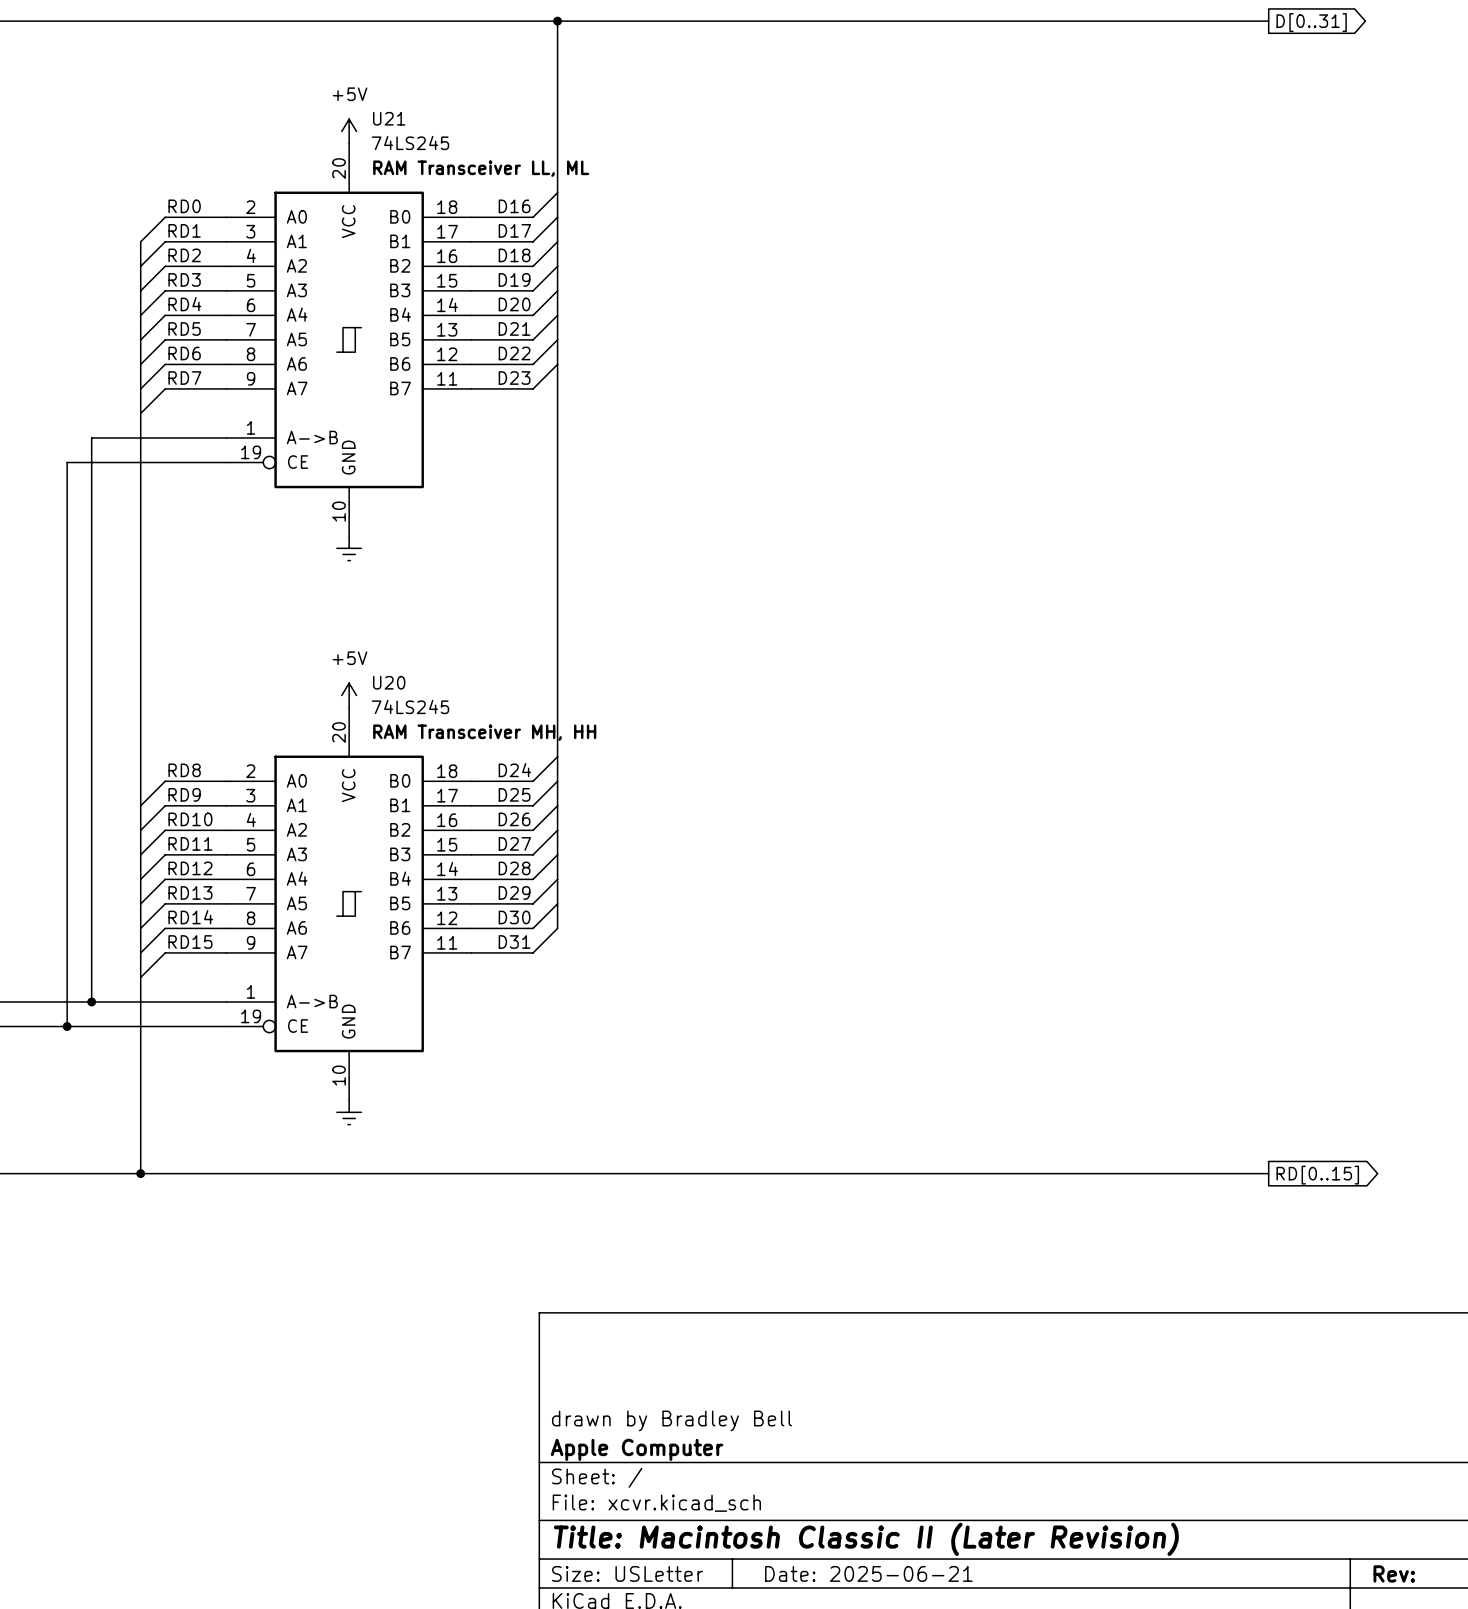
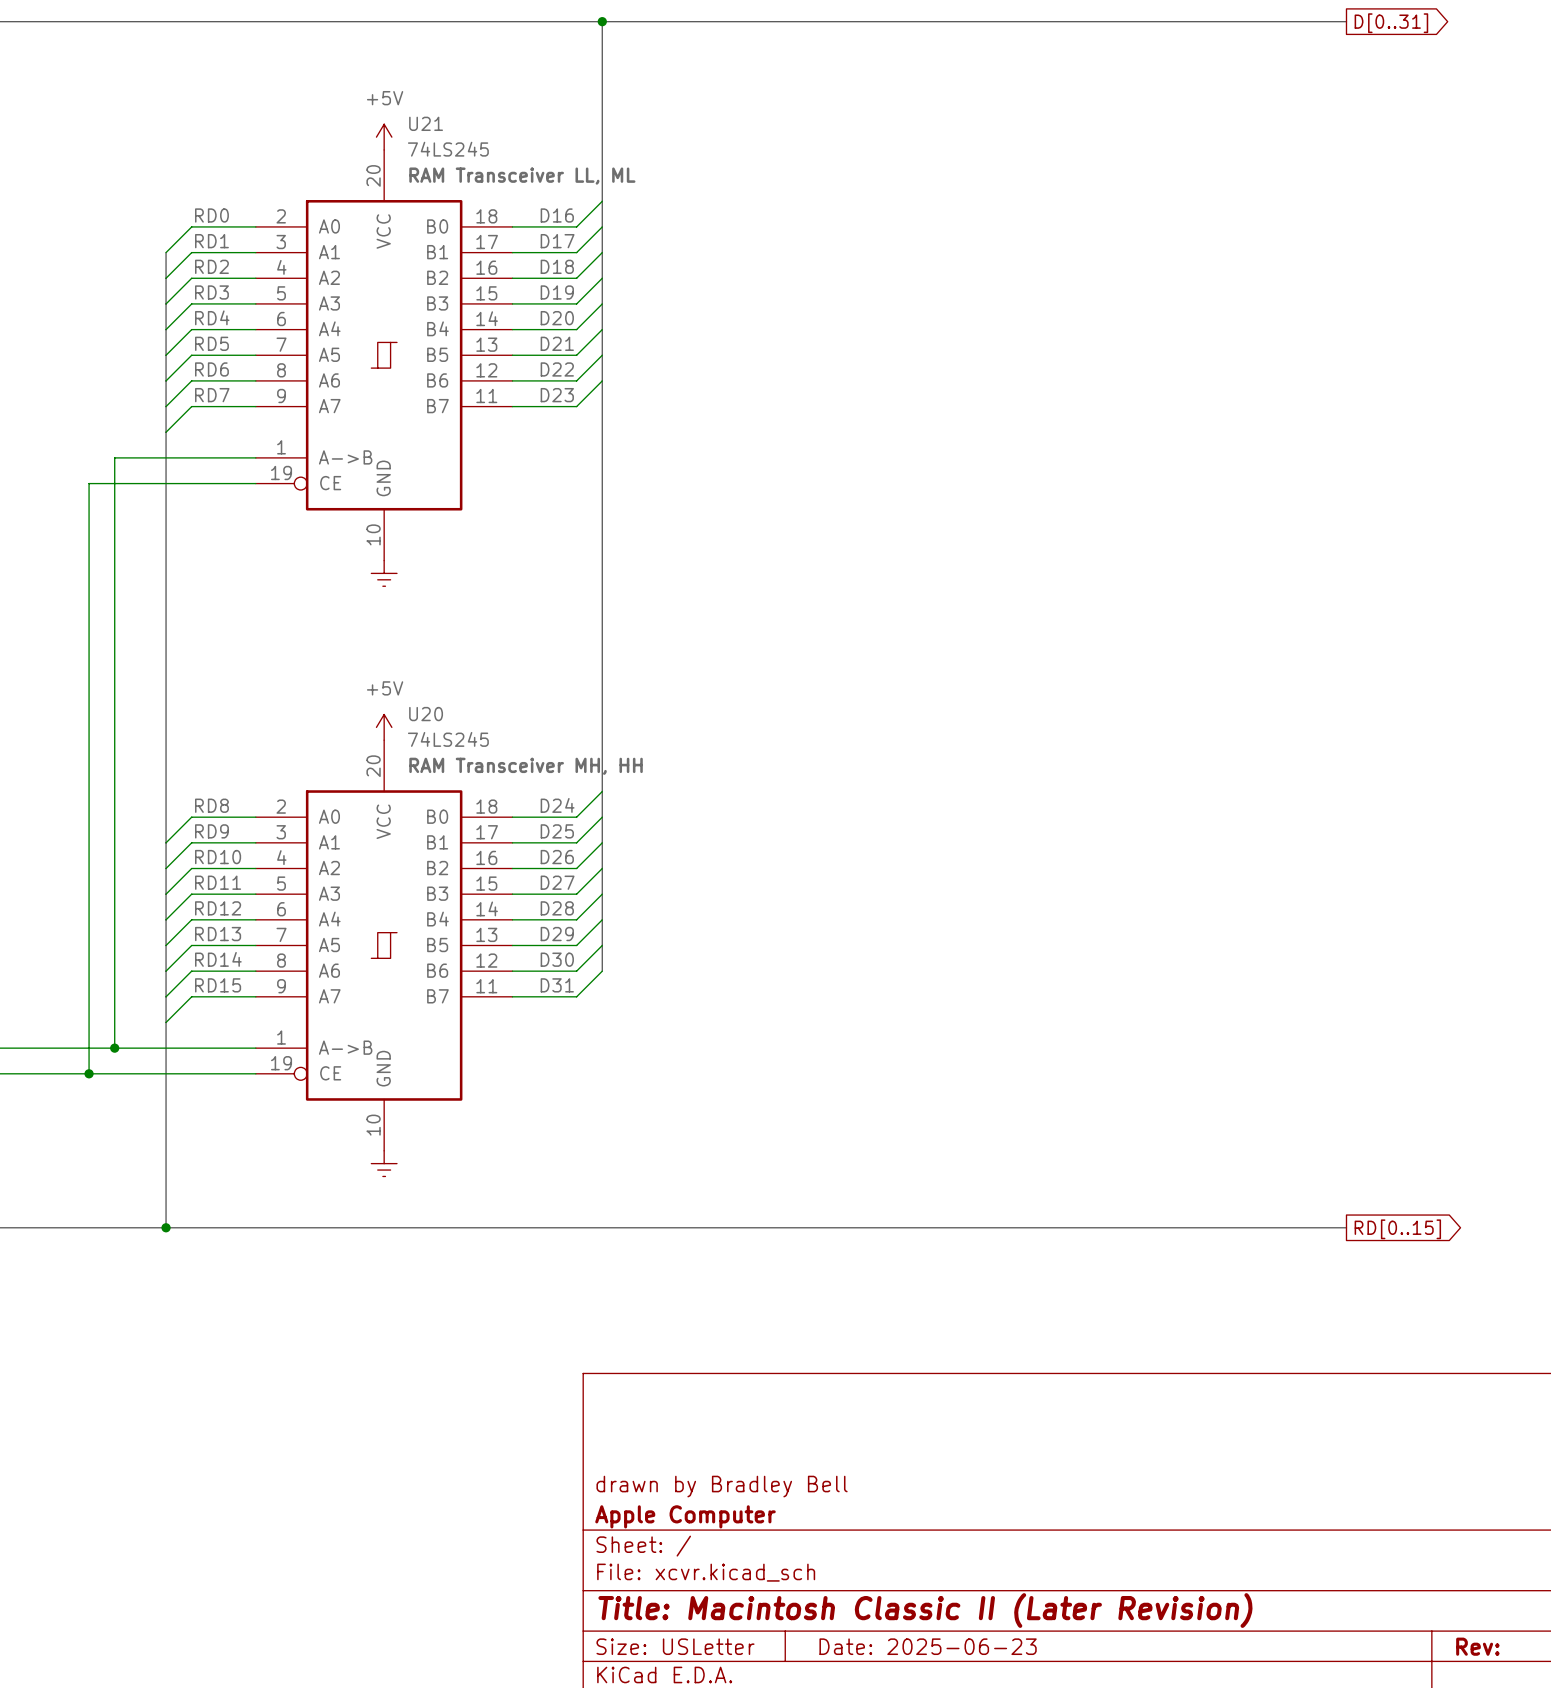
title block: Date: 2025-06-21 (868, 1573) -> Date: 2025-06-23 (928, 1646)

